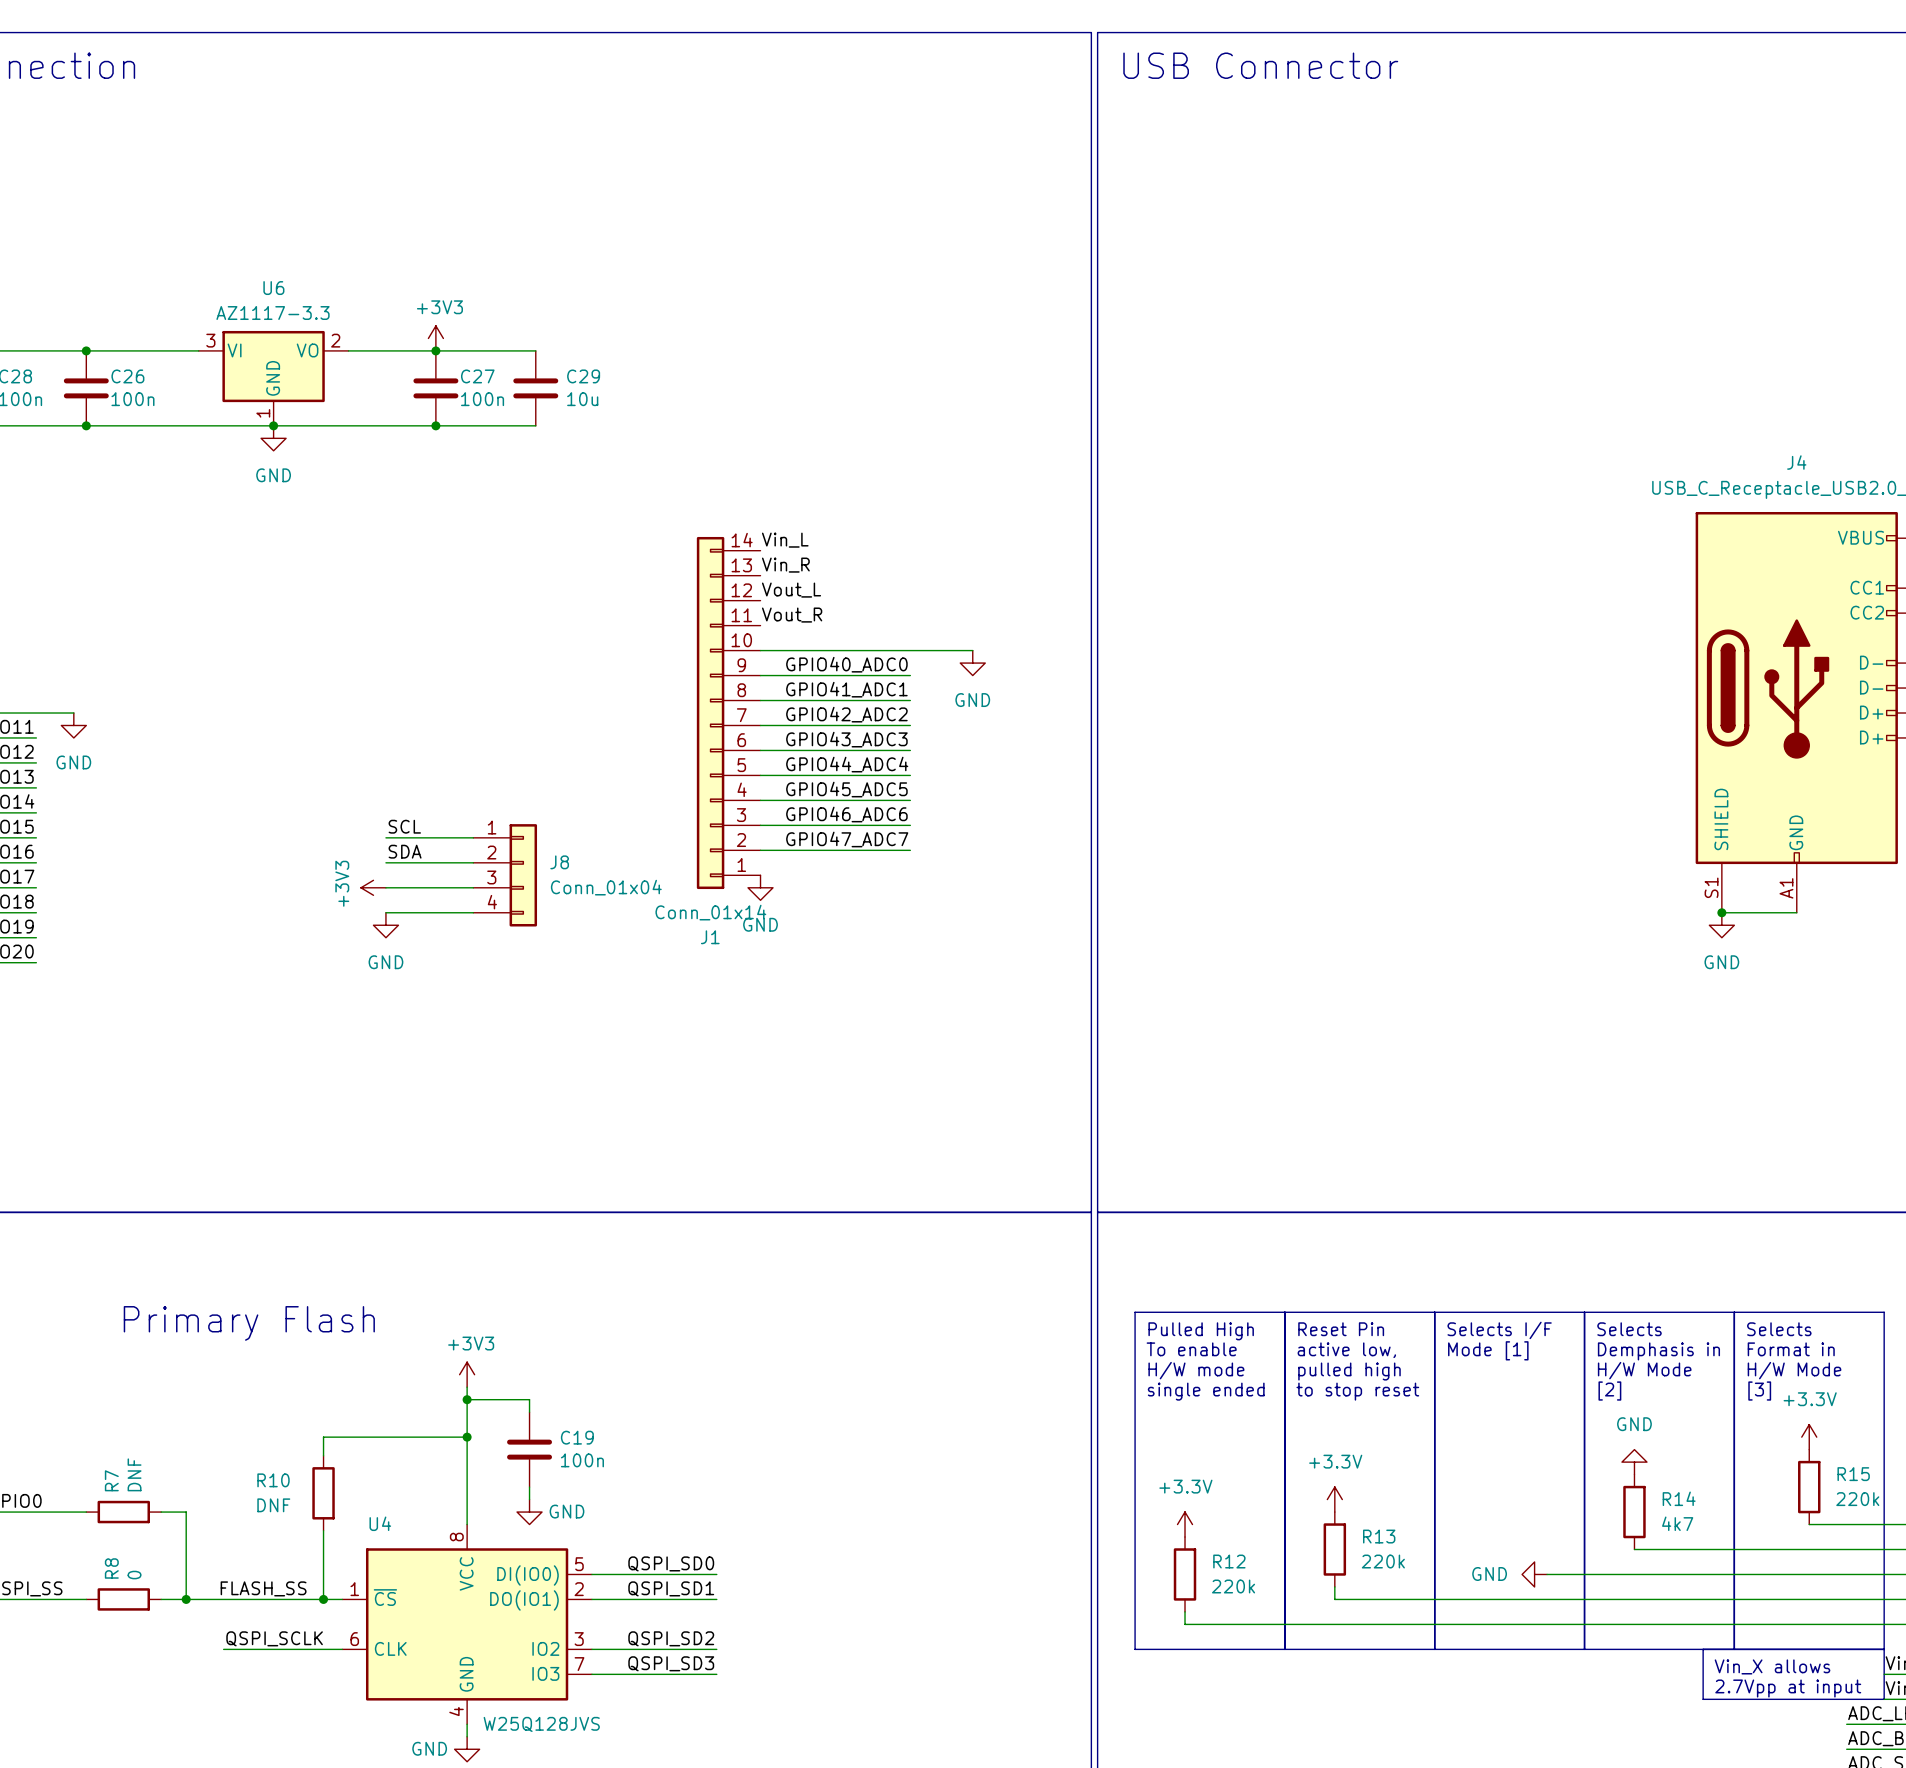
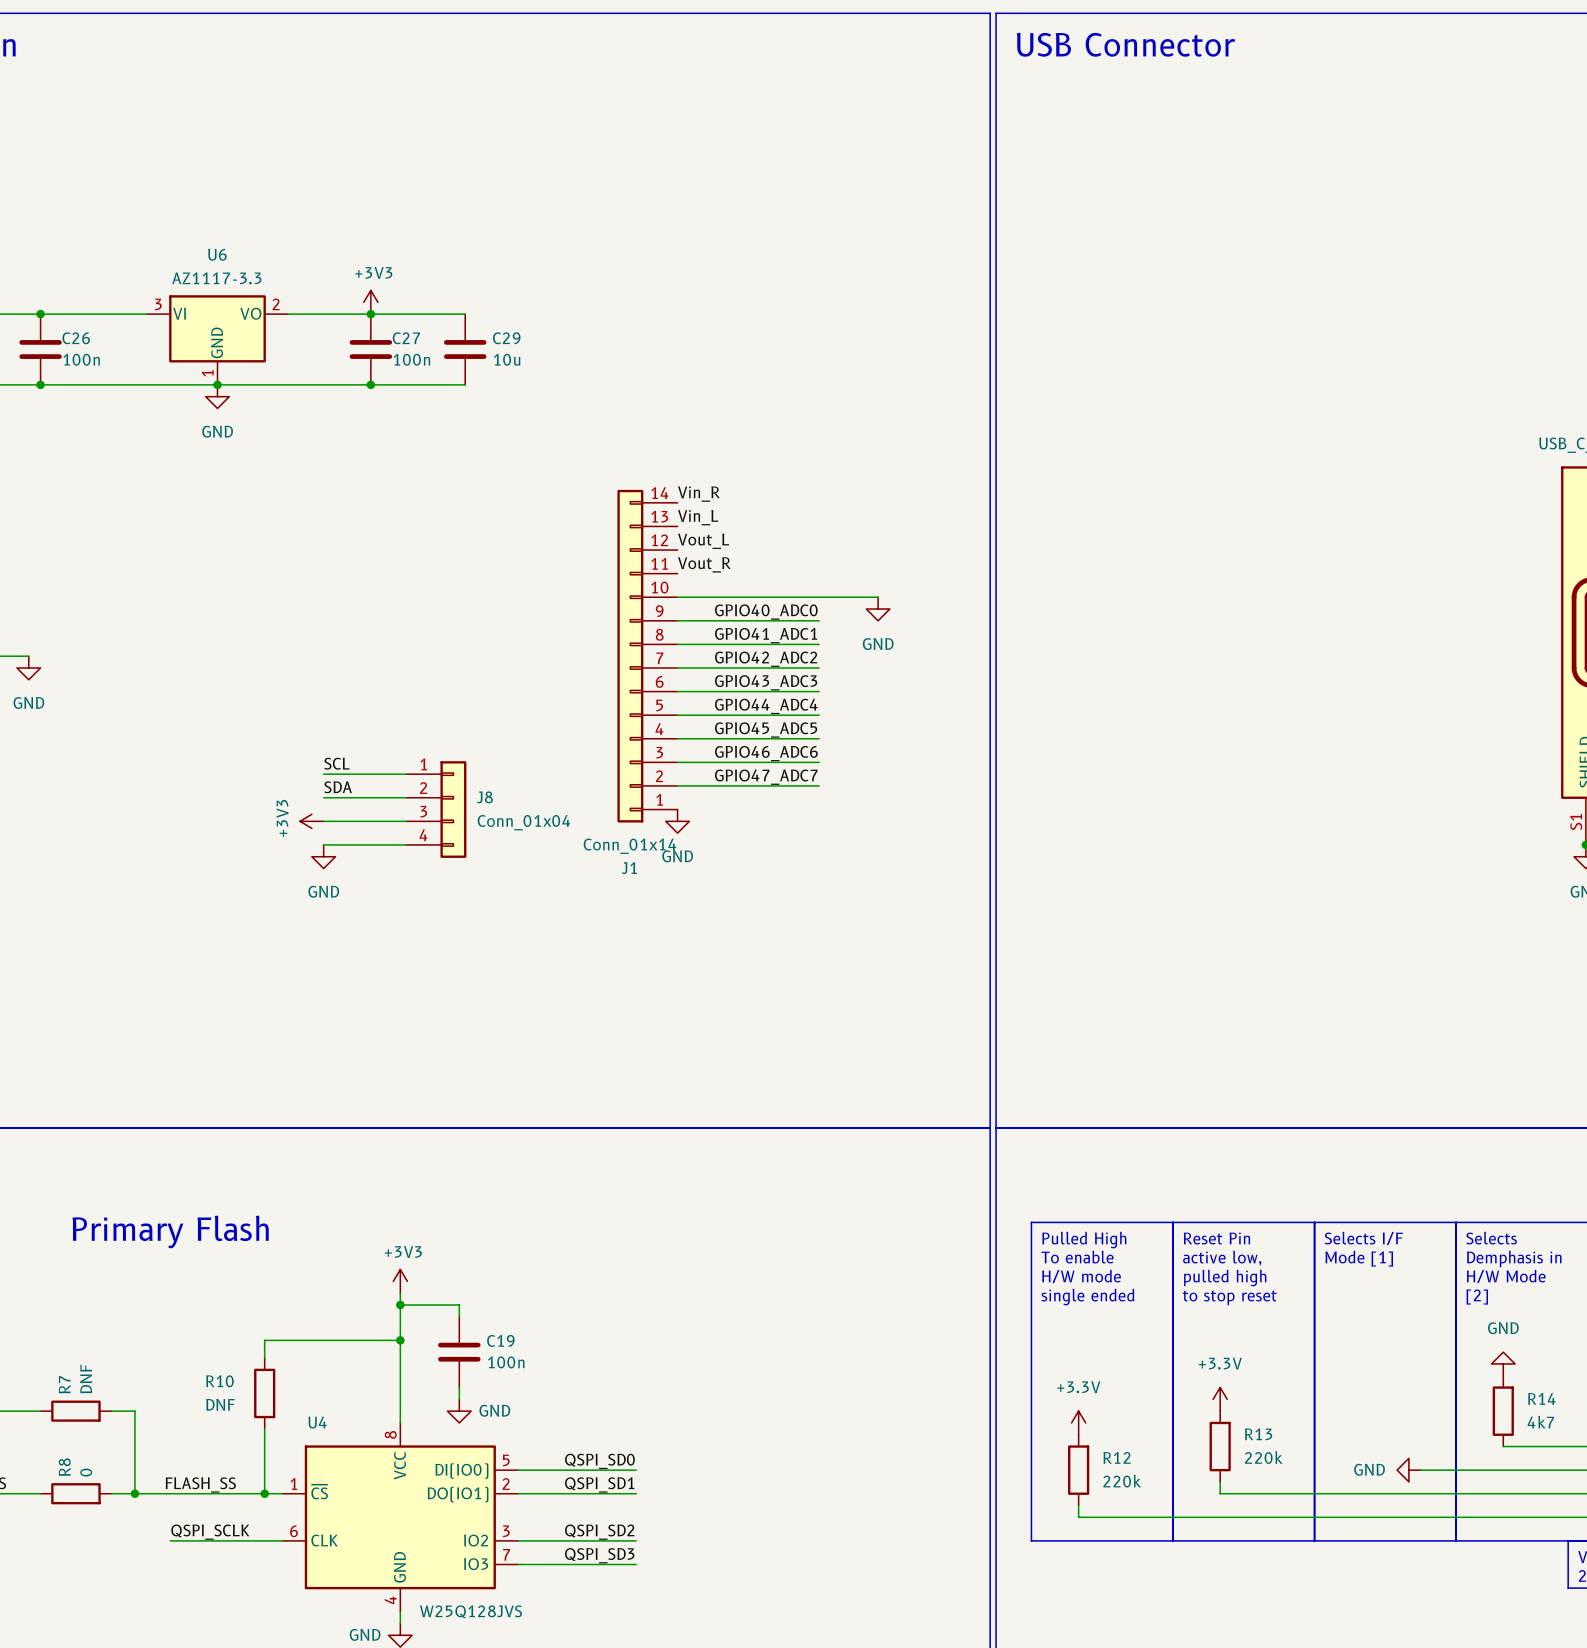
label: Vin_L (785, 540) -> Vin_R (698, 494)
label: Vin_R (785, 565) -> Vin_L (698, 517)

